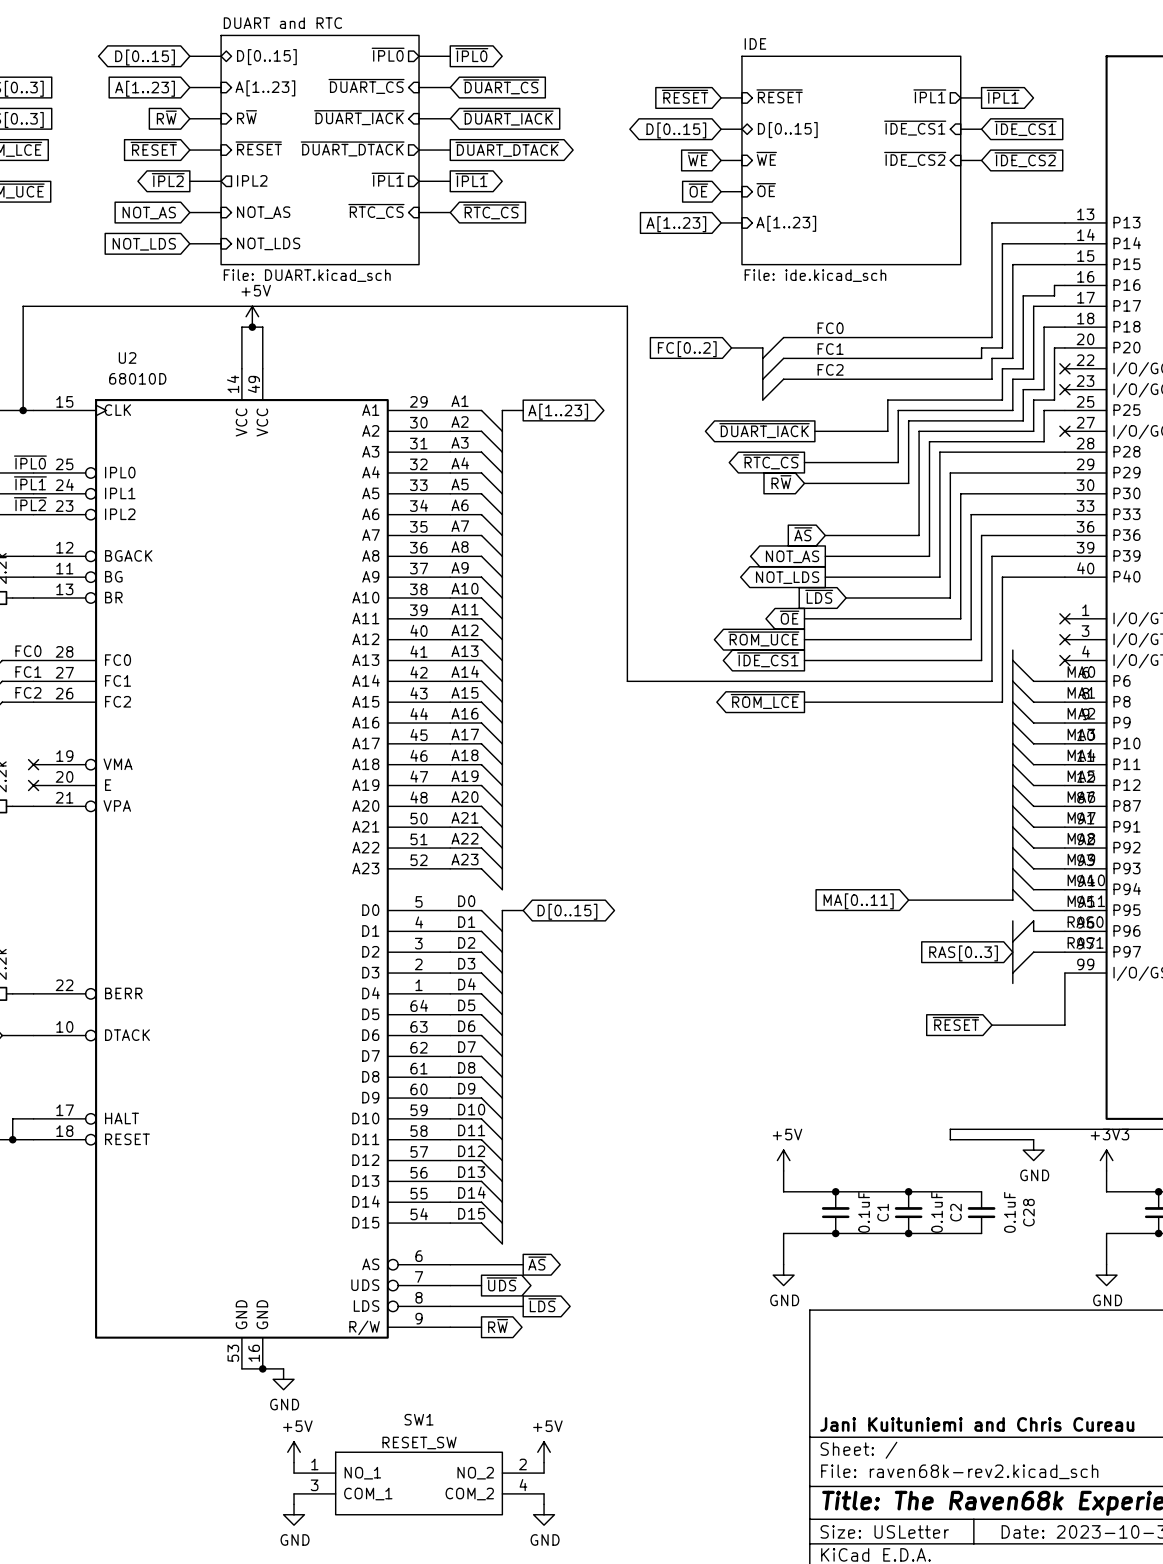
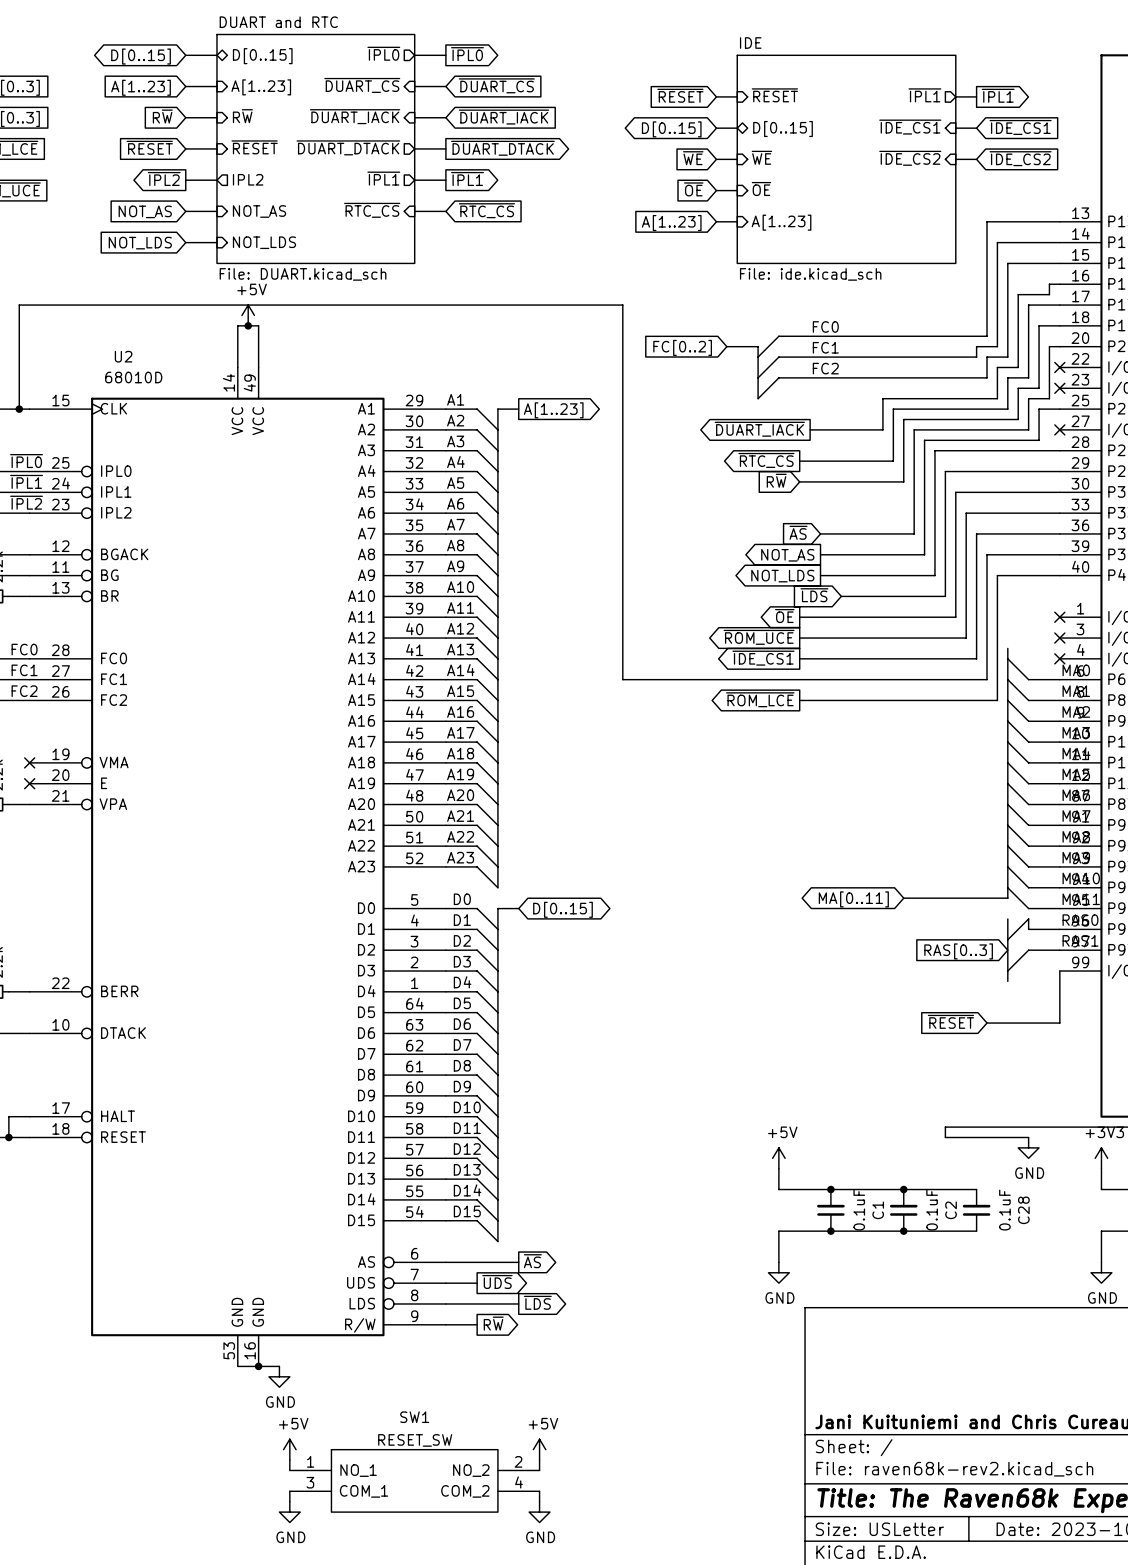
global label shape: input (858, 901) -> bidirectional (853, 899)

